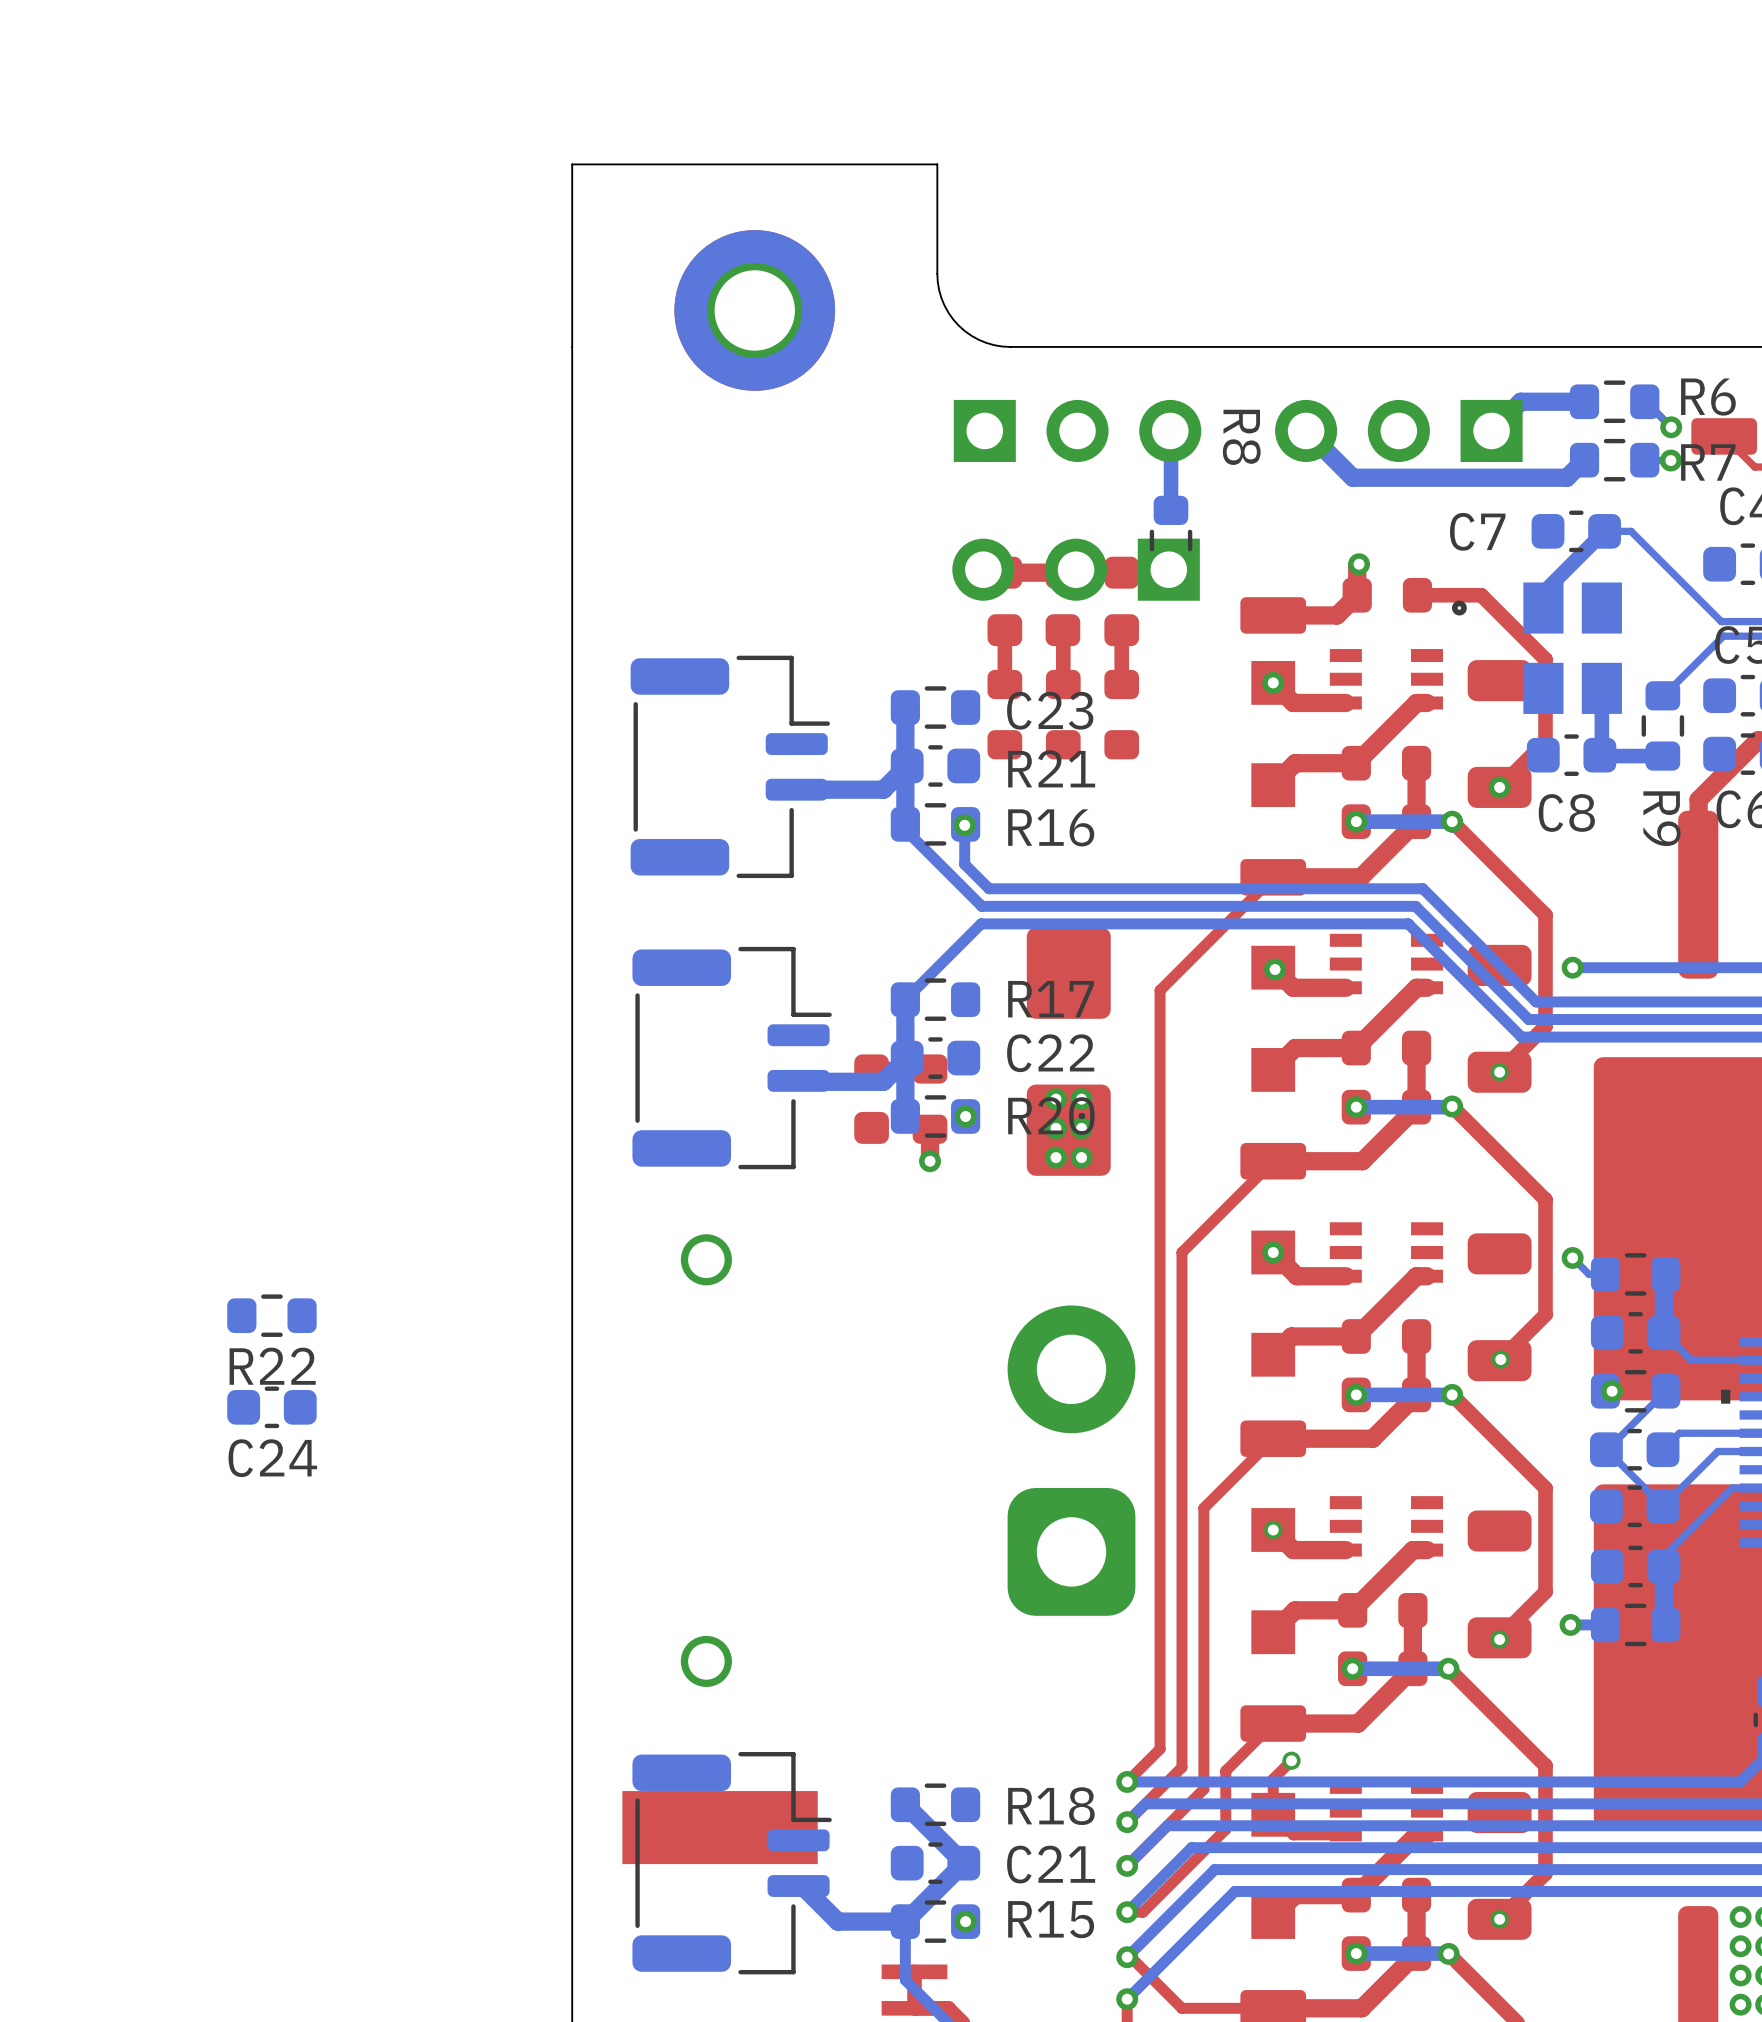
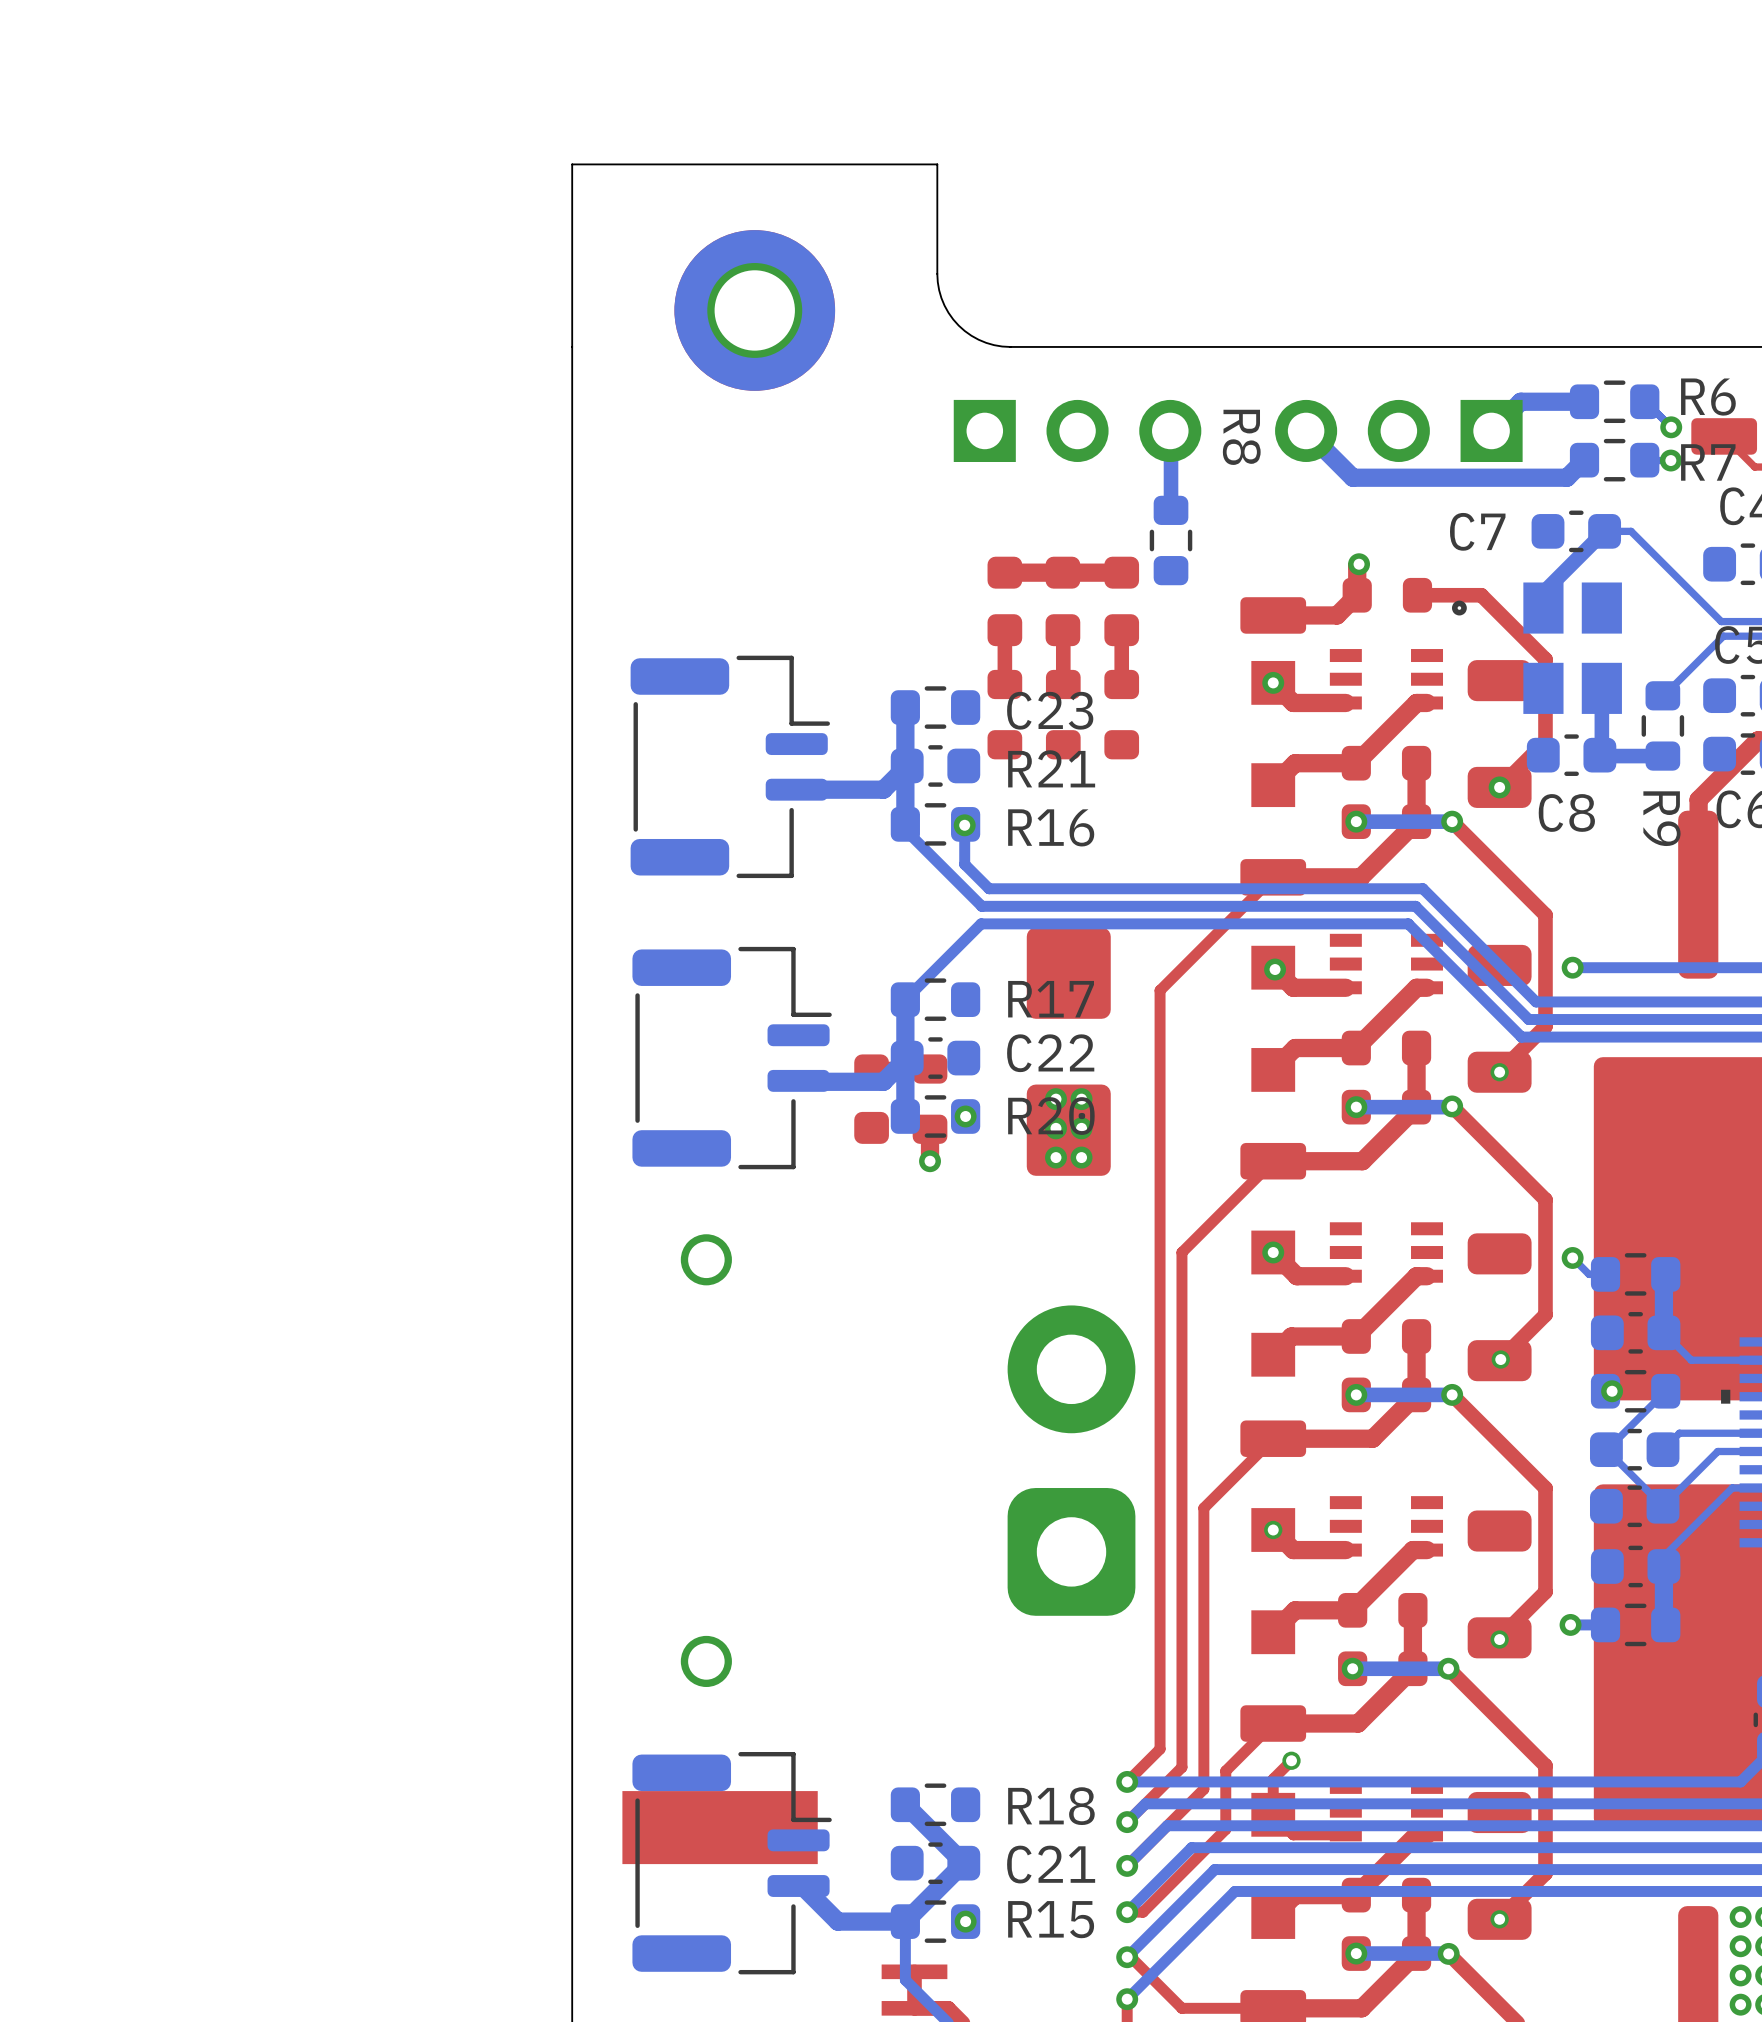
part: (1076, 569) -> none
R22: (271, 1315) -> none
C24: (271, 1407) -> none

